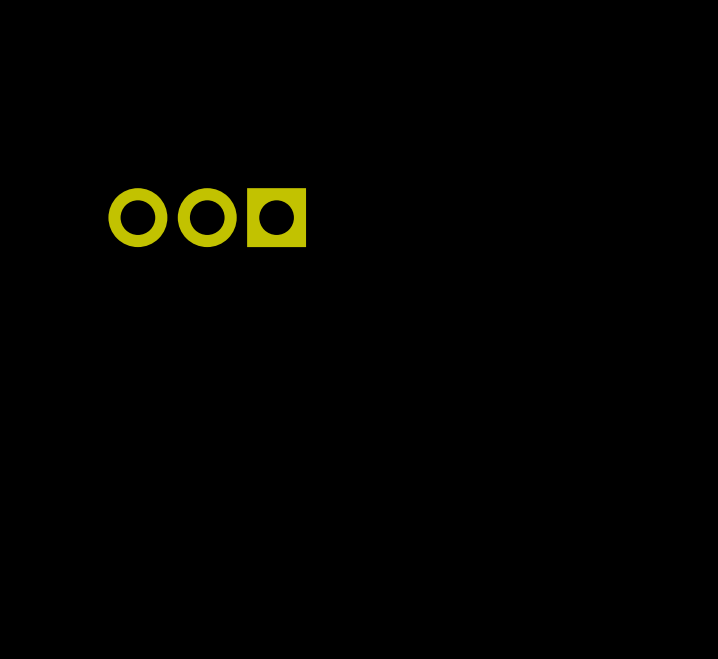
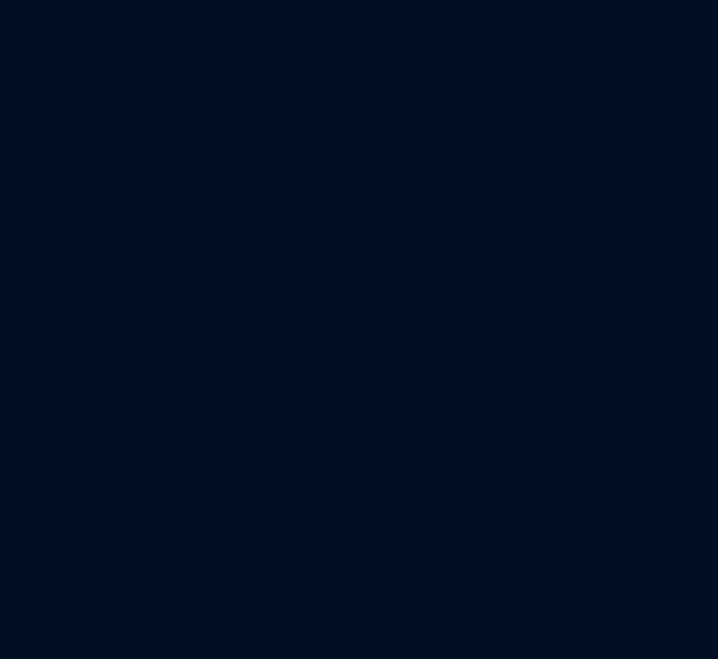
part: (207, 217) -> none

